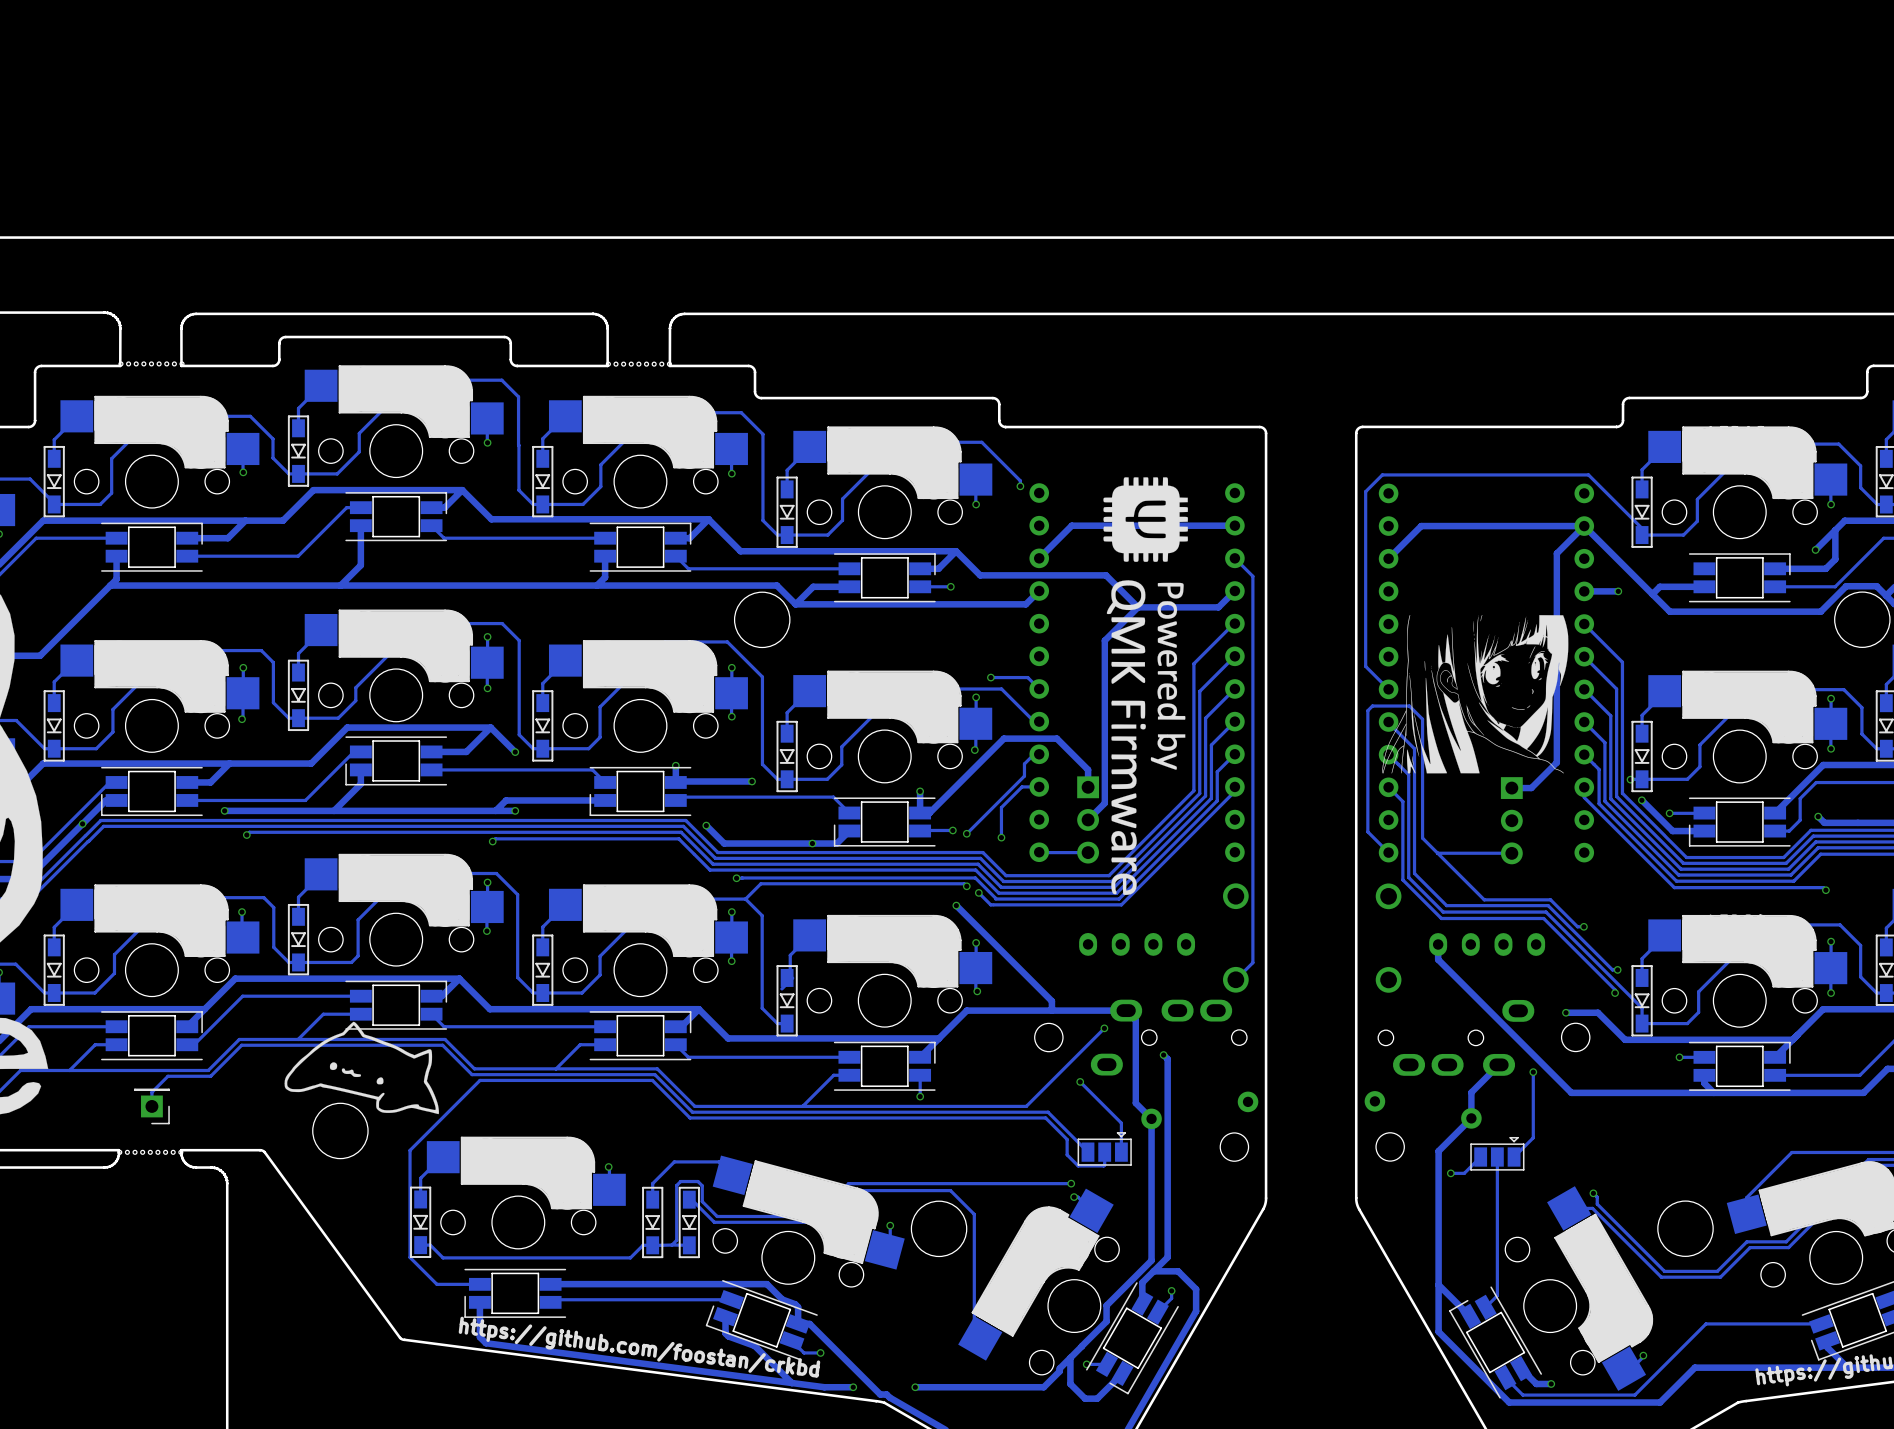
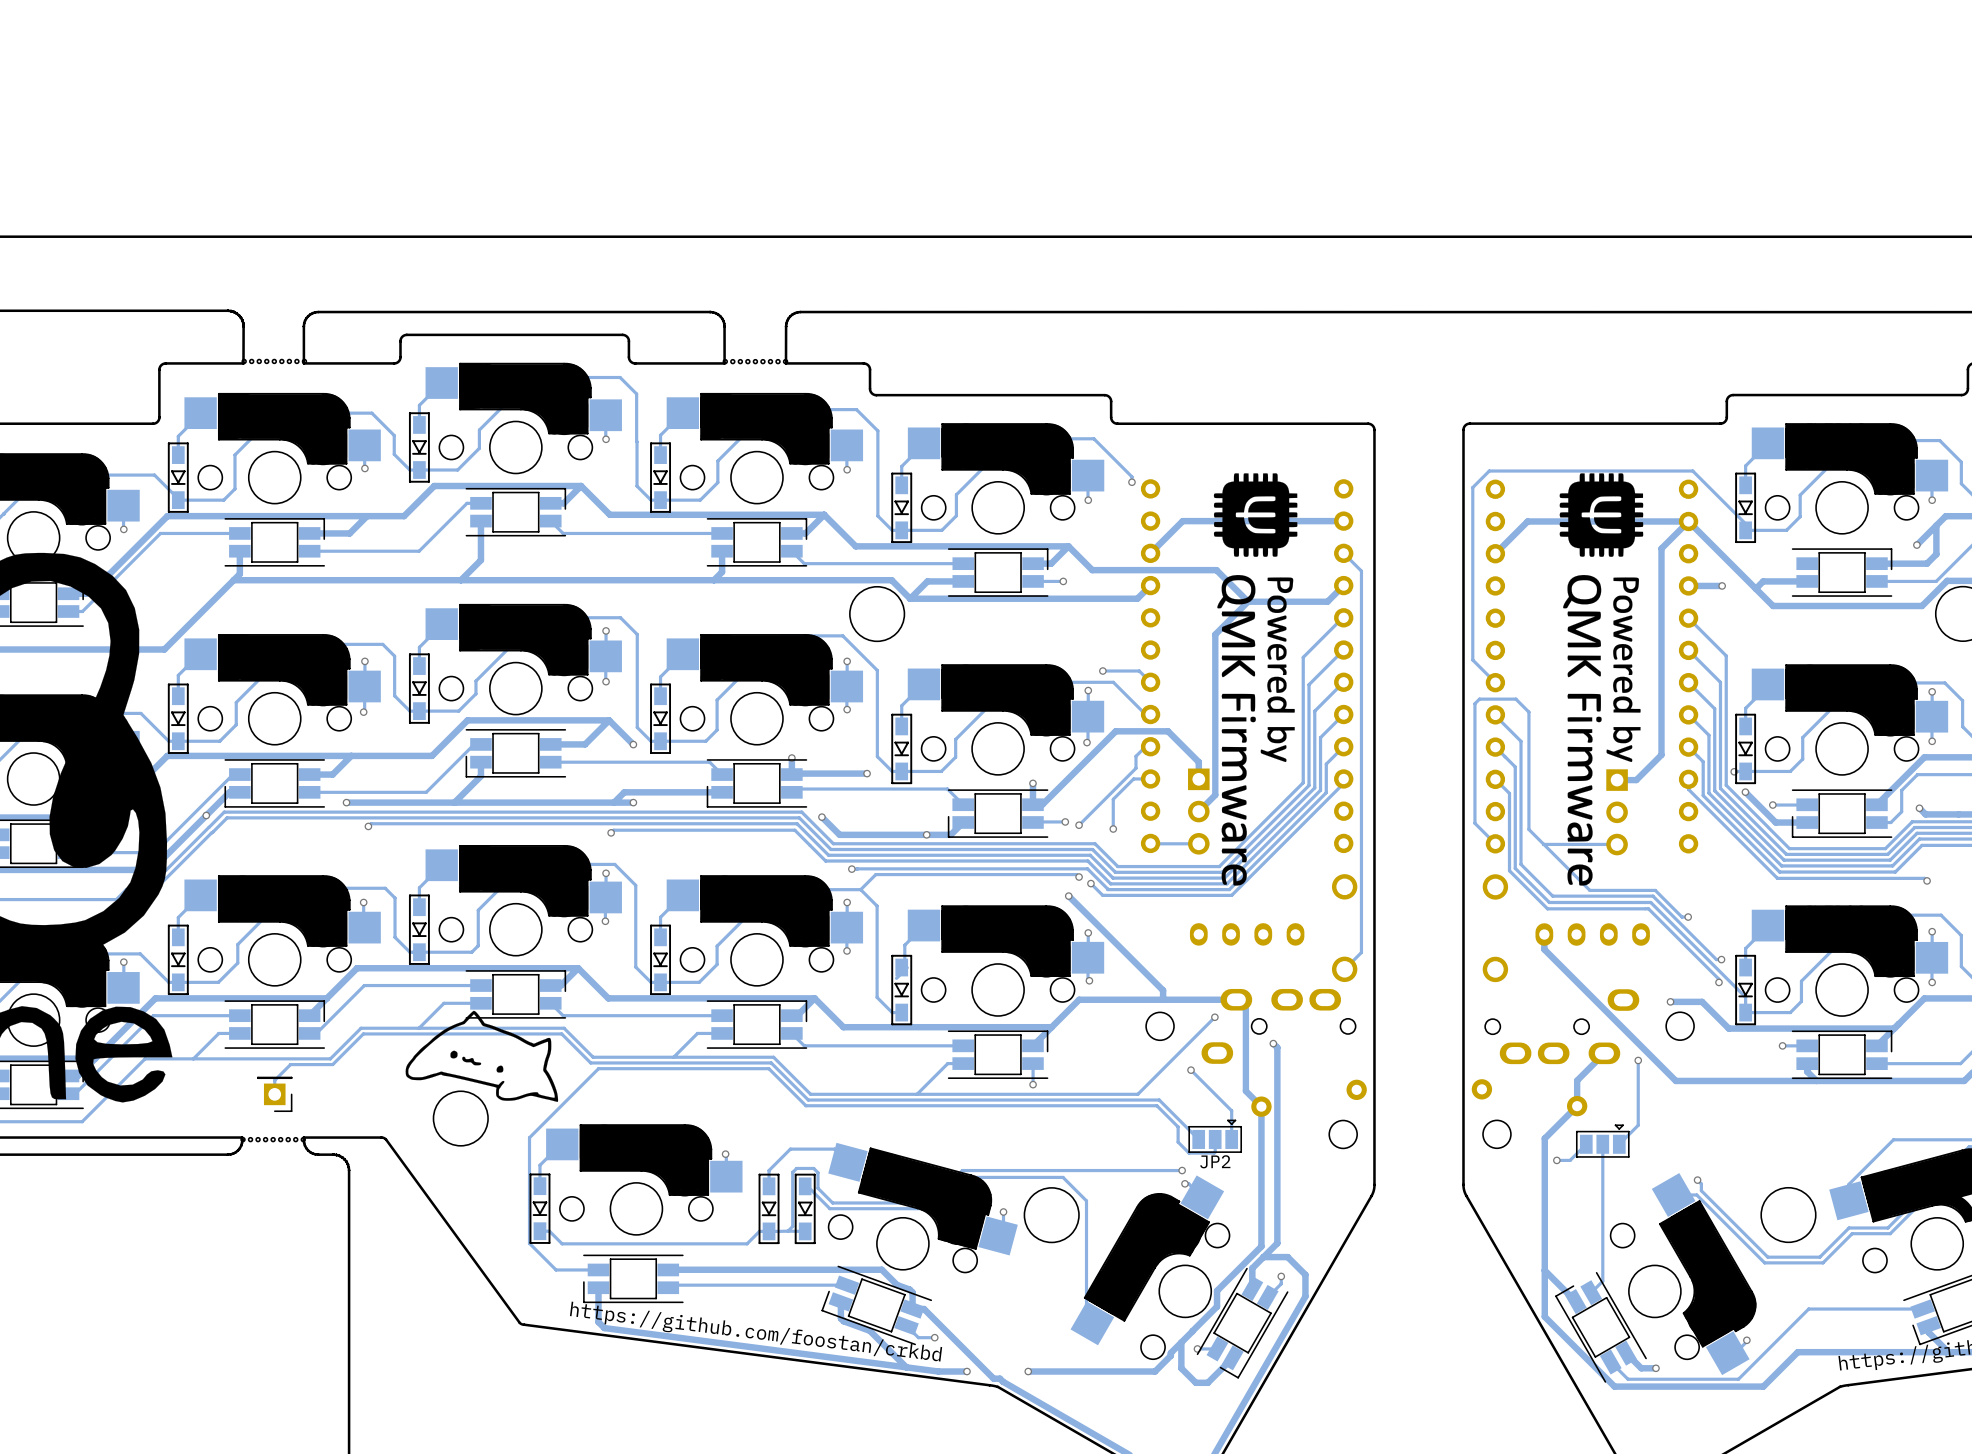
drawing: none -> [1559, 473, 1644, 886]
drawing: [1382, 615, 1569, 774] -> none
JP2 name: none -> JP2 (1215, 1161)

